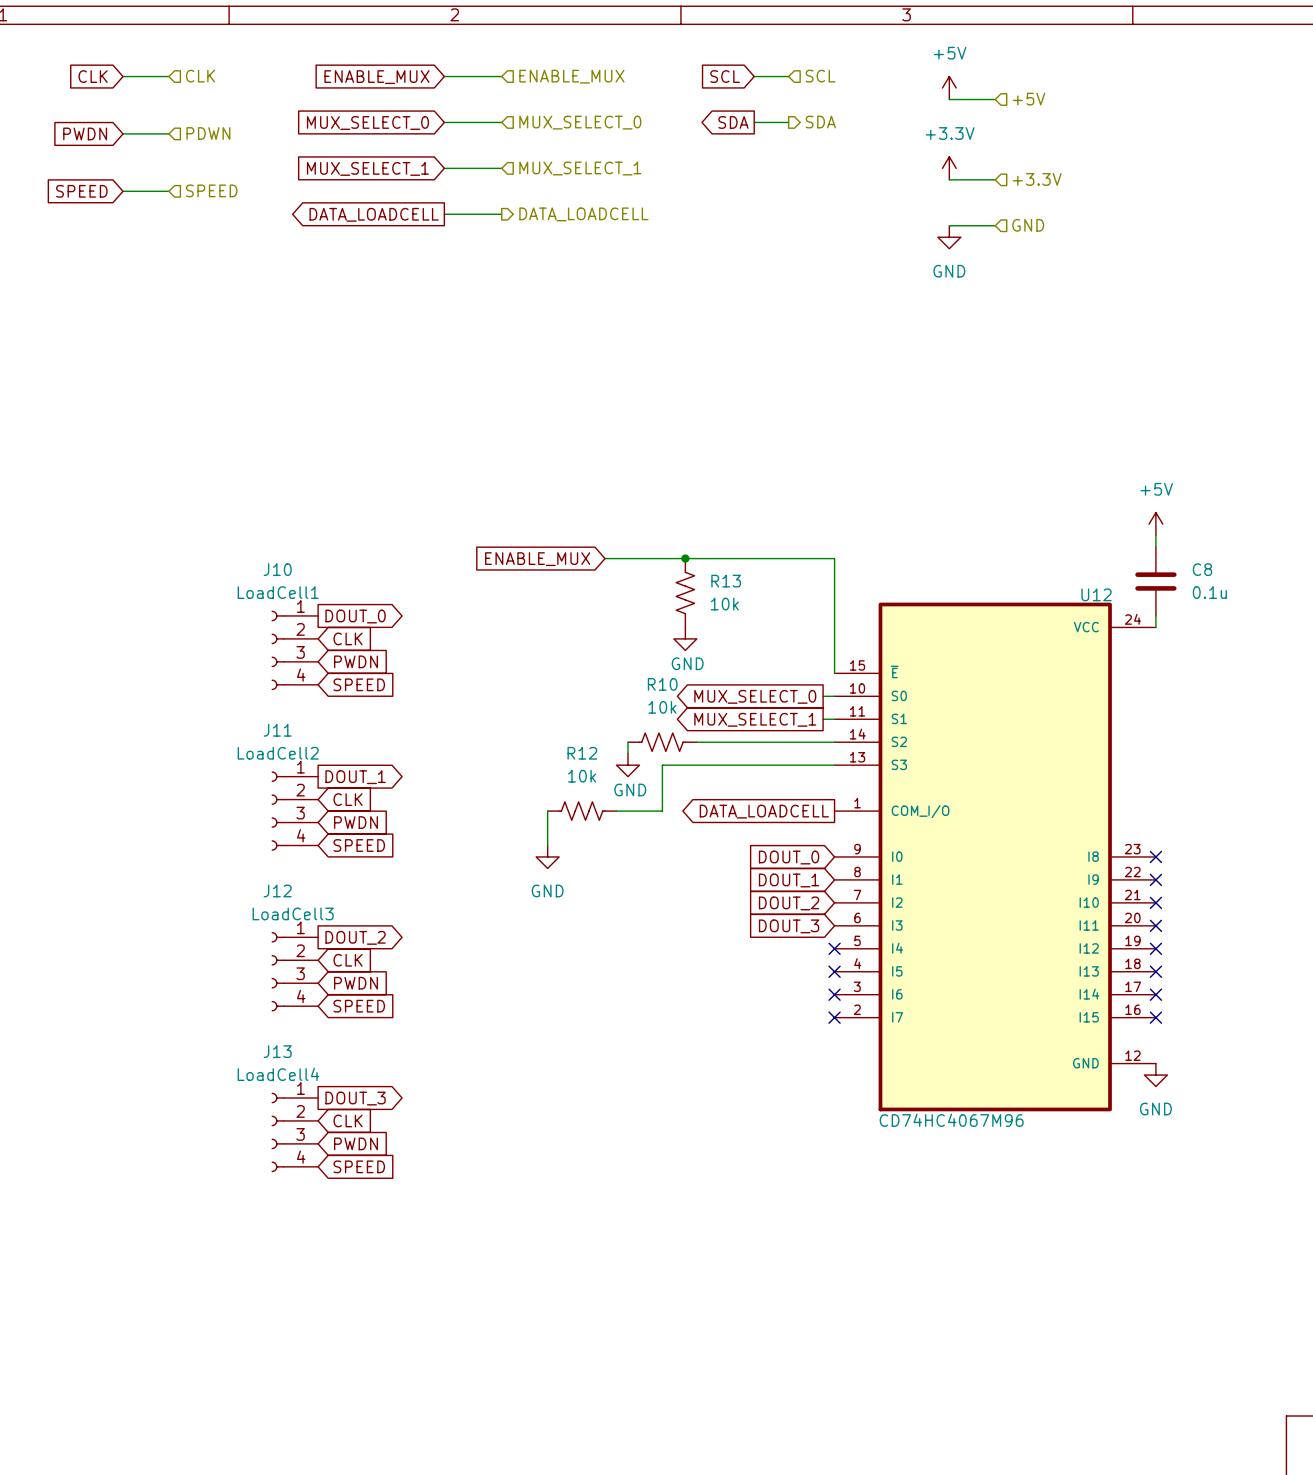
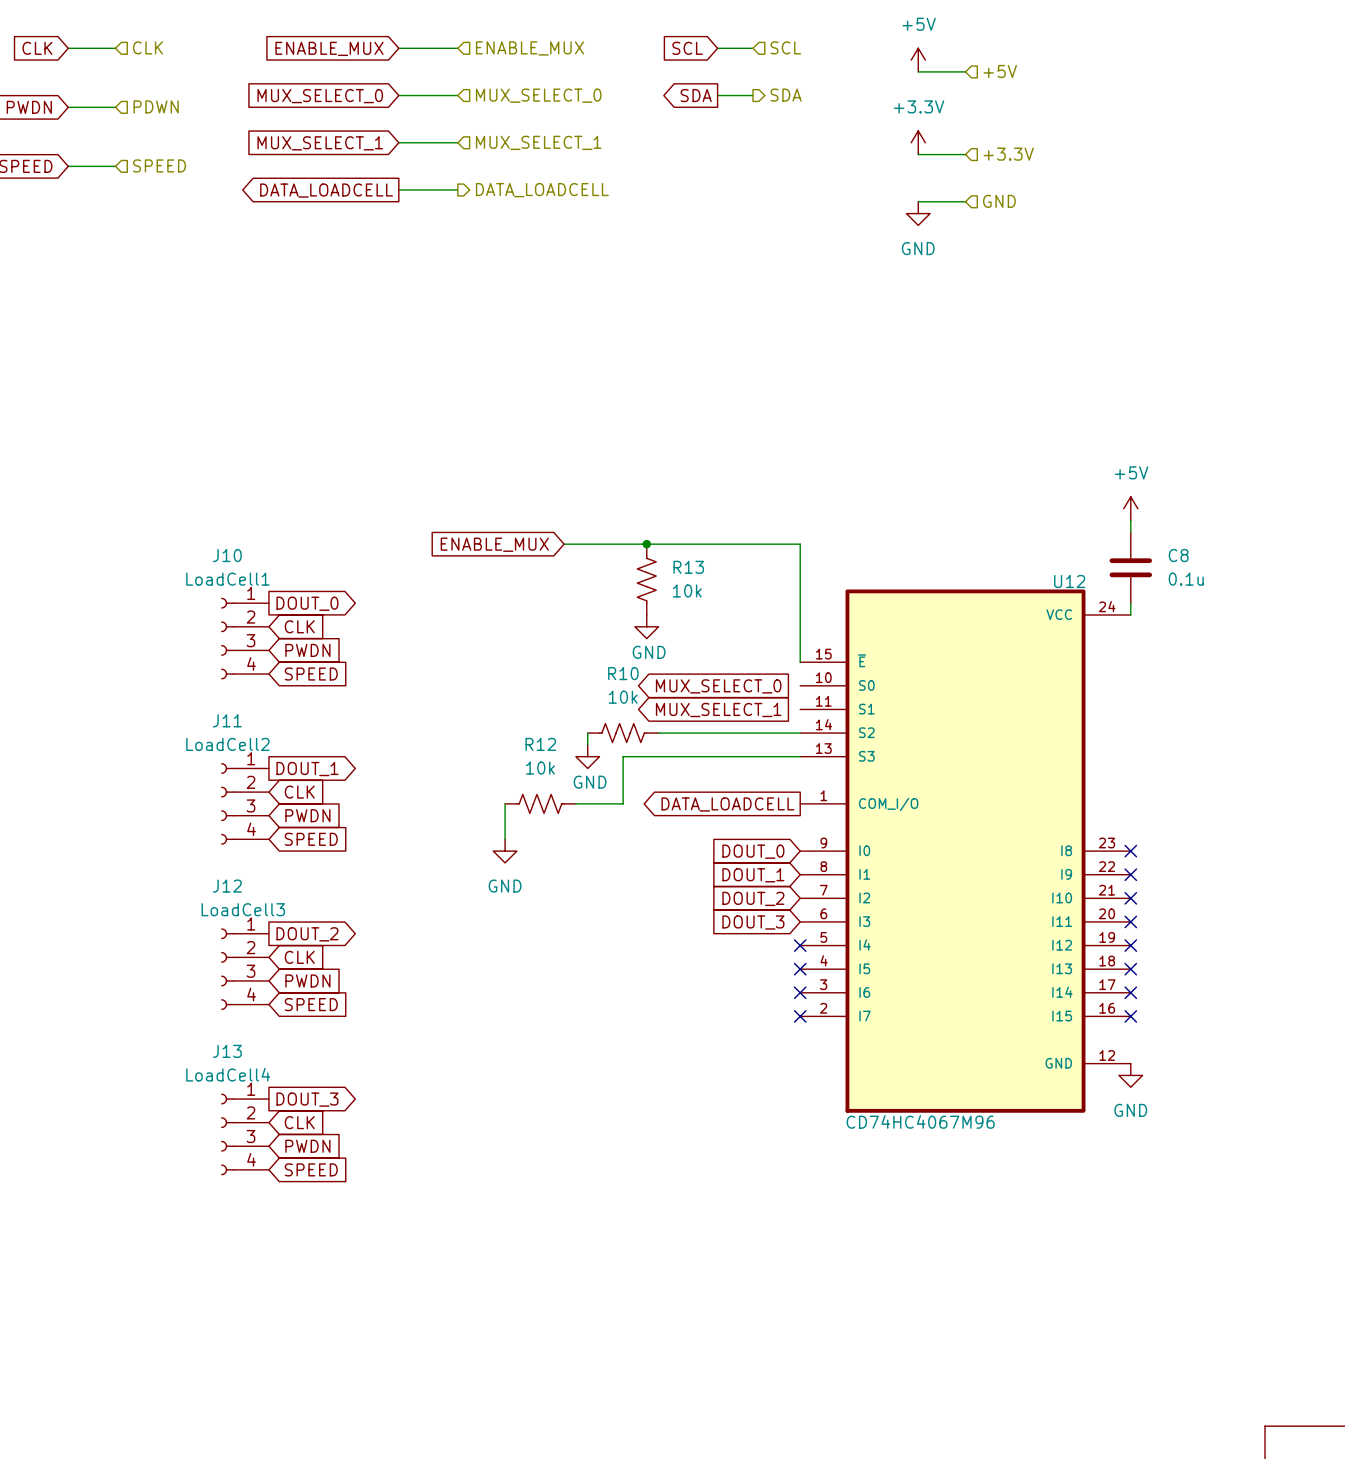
wire: (823, 696) (834, 696) -> none
wire: (823, 719) (834, 719) -> none

